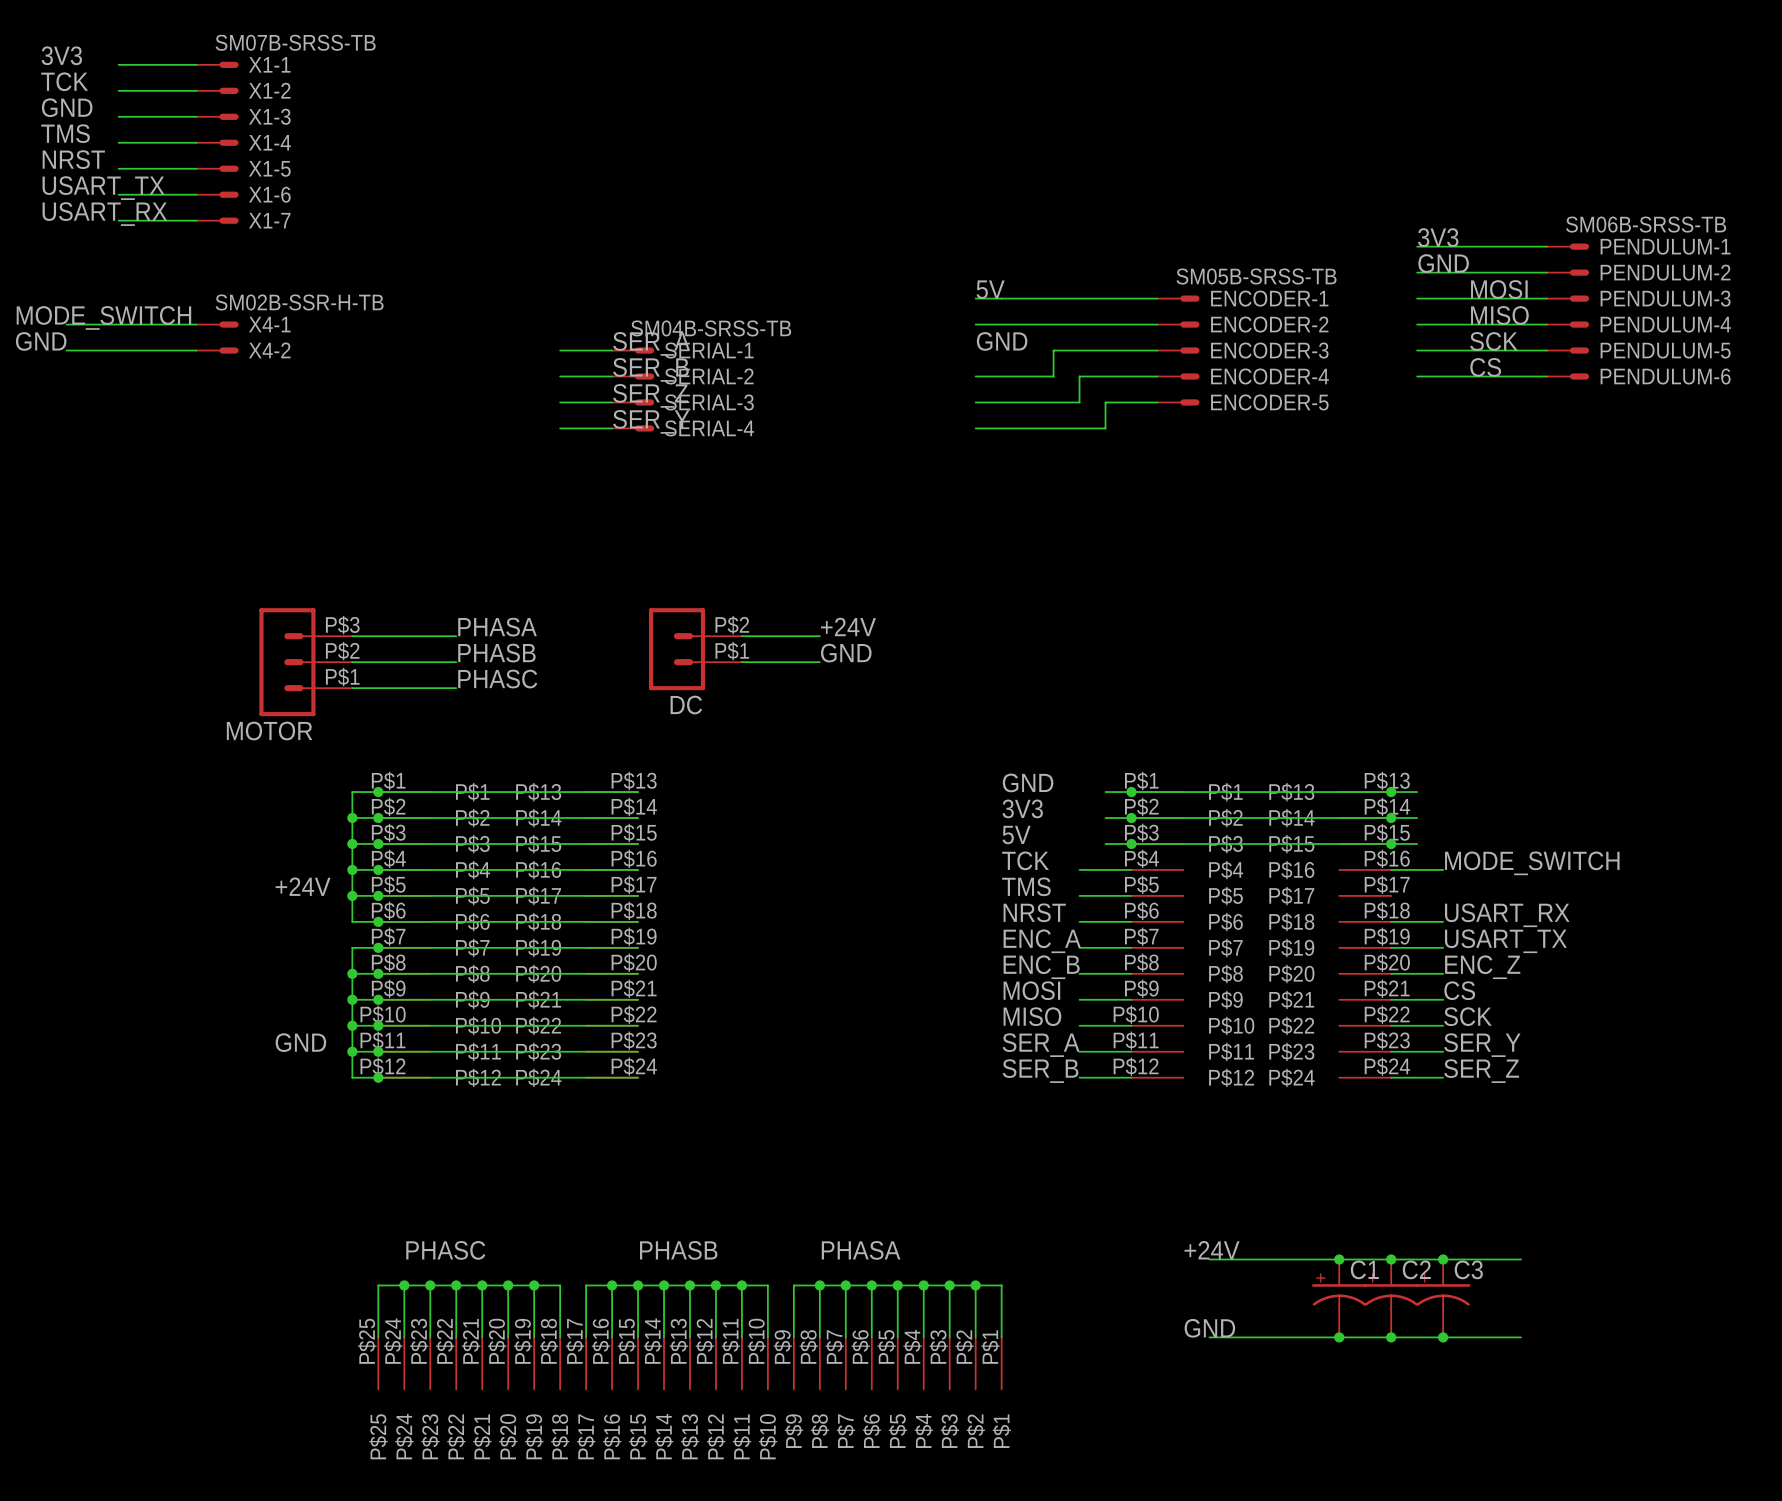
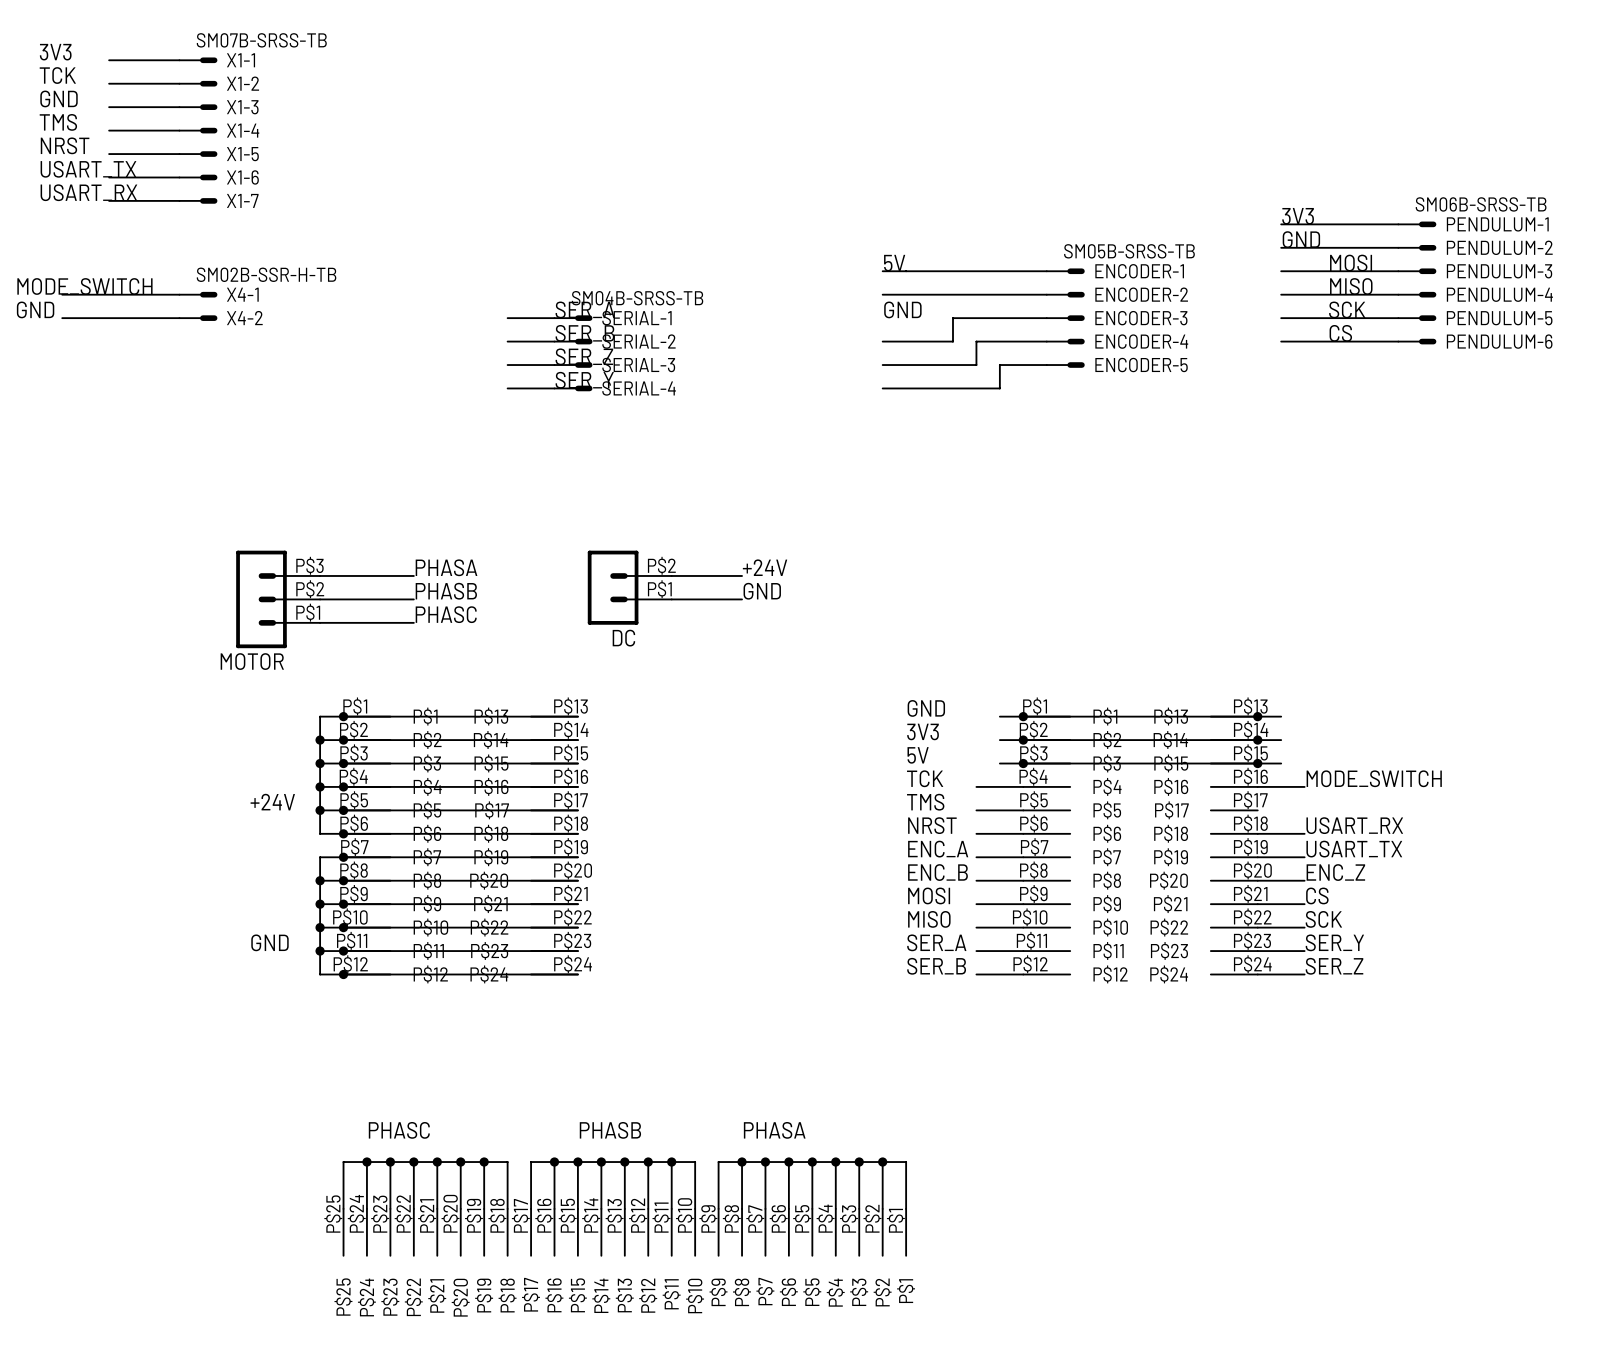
label: +24V (1212, 1250) -> none
wire: (1209, 1259) (1521, 1259) -> none
junction: (1339, 1259) -> none
junction: (1391, 1259) -> none
junction: (1443, 1259) -> none
C1: (1339, 1298) -> none
C2: (1391, 1298) -> none
C3: (1443, 1298) -> none
label: GND (1209, 1328) -> none
wire: (1209, 1337) (1521, 1337) -> none
junction: (1339, 1337) -> none
junction: (1391, 1337) -> none
junction: (1443, 1337) -> none

